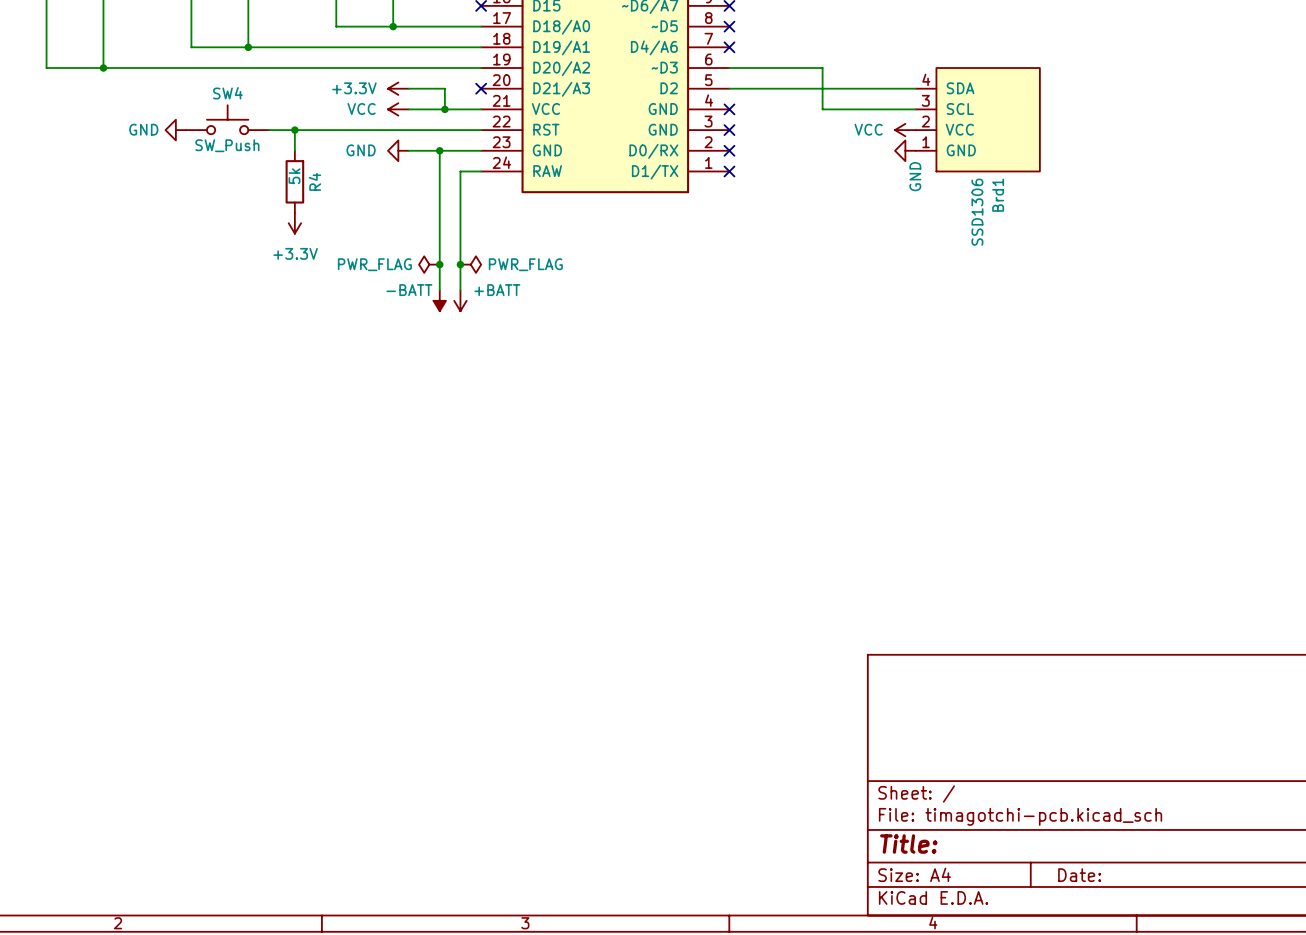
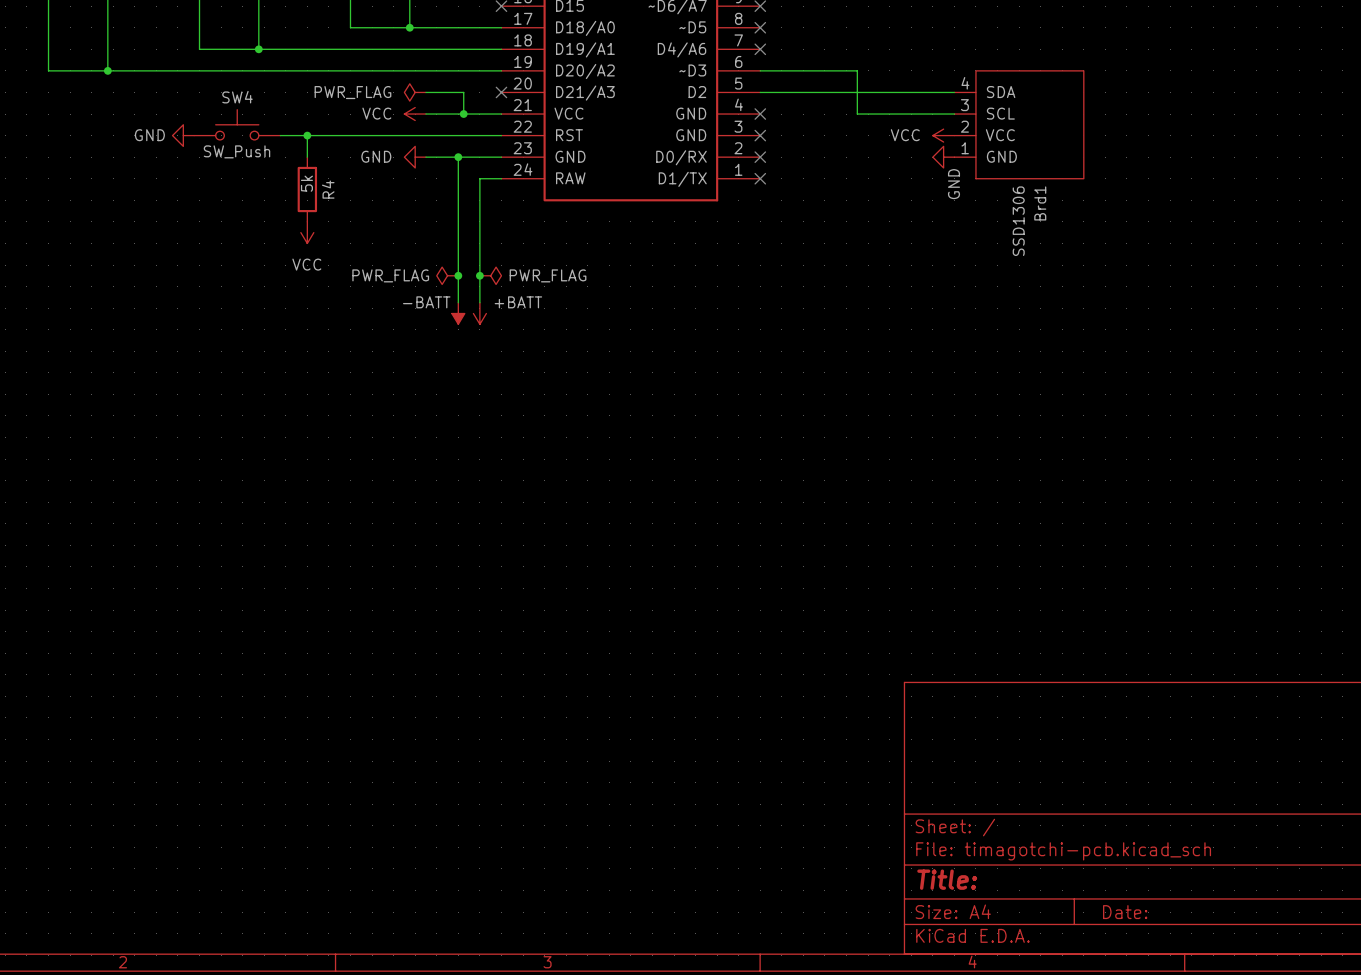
power symbol: +3.3V (398, 88) -> PWR_FLAG (415, 92)
power symbol: +3.3V (294, 223) -> VCC (307, 232)

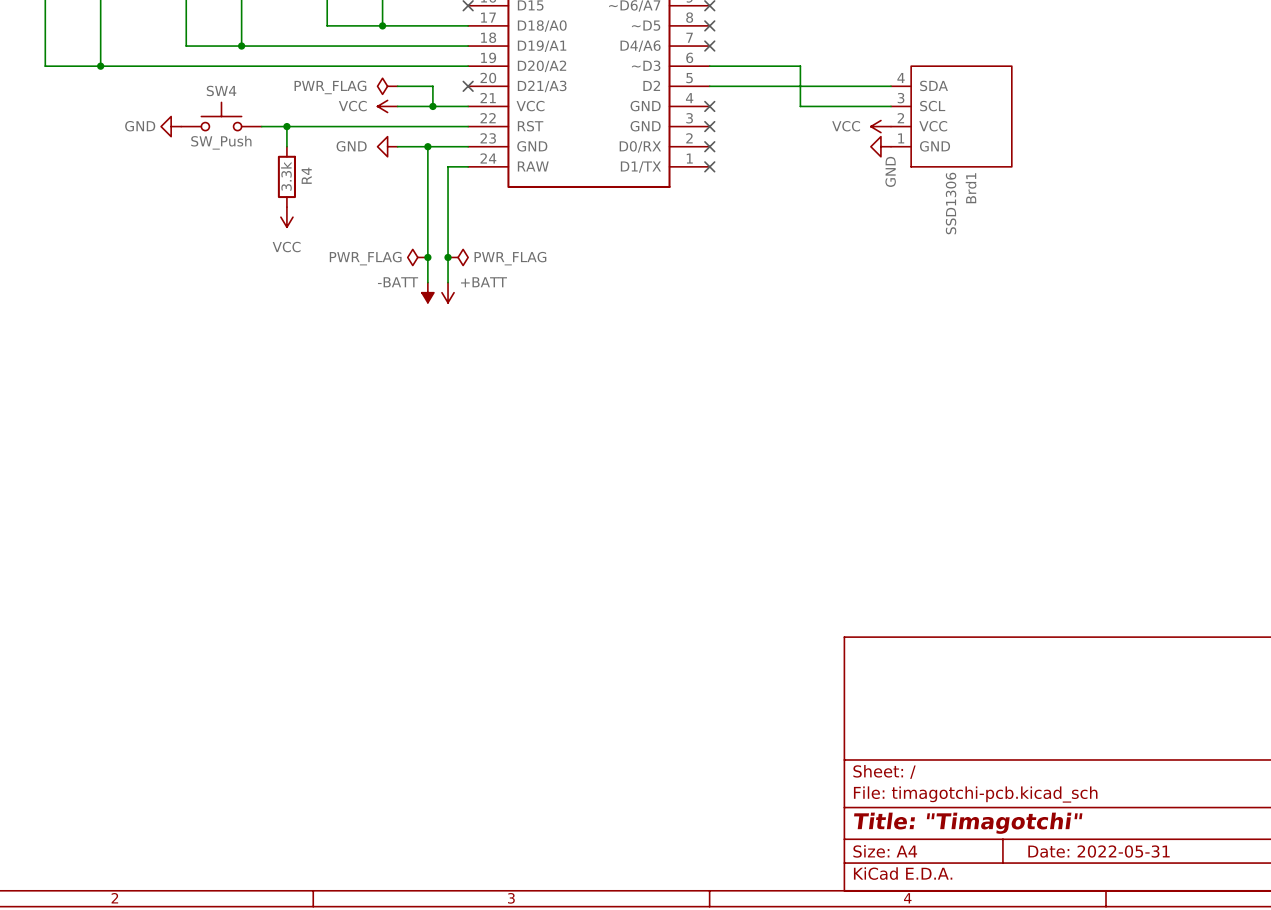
R4 value: 5k (306, 183) -> 3.3k (286, 176)
title block: Title: (947, 879) -> Title: "Timagotchi" (968, 823)
title block: Date: (1125, 912) -> Date: 2022-05-31 (1099, 851)

